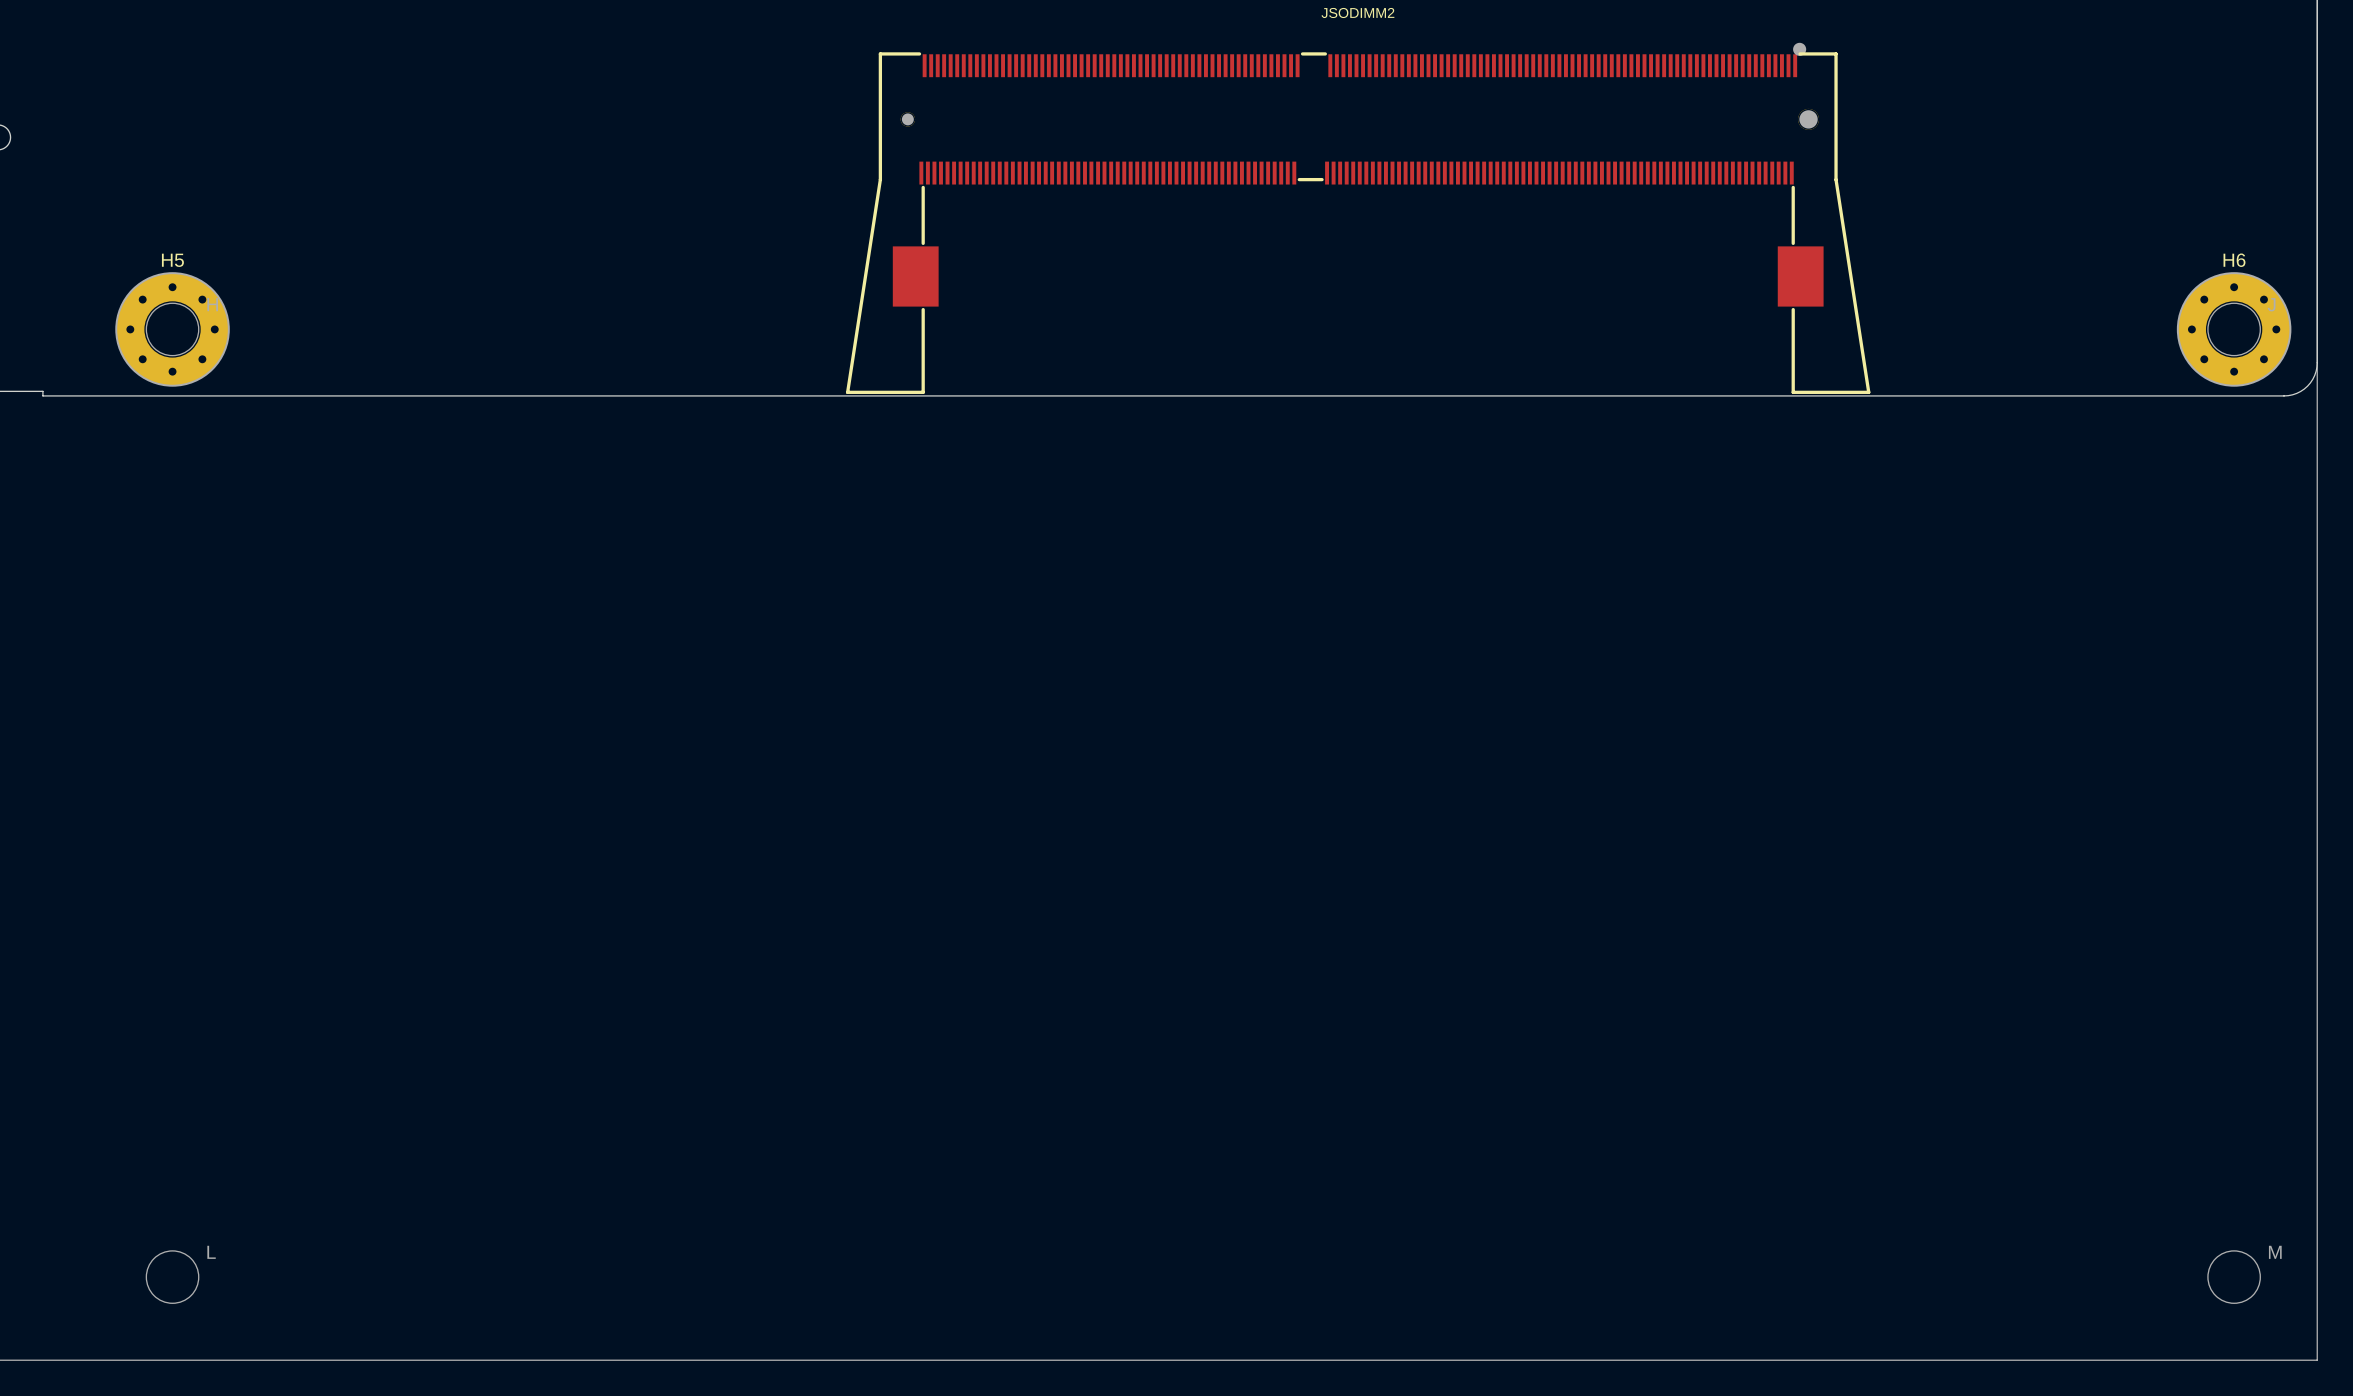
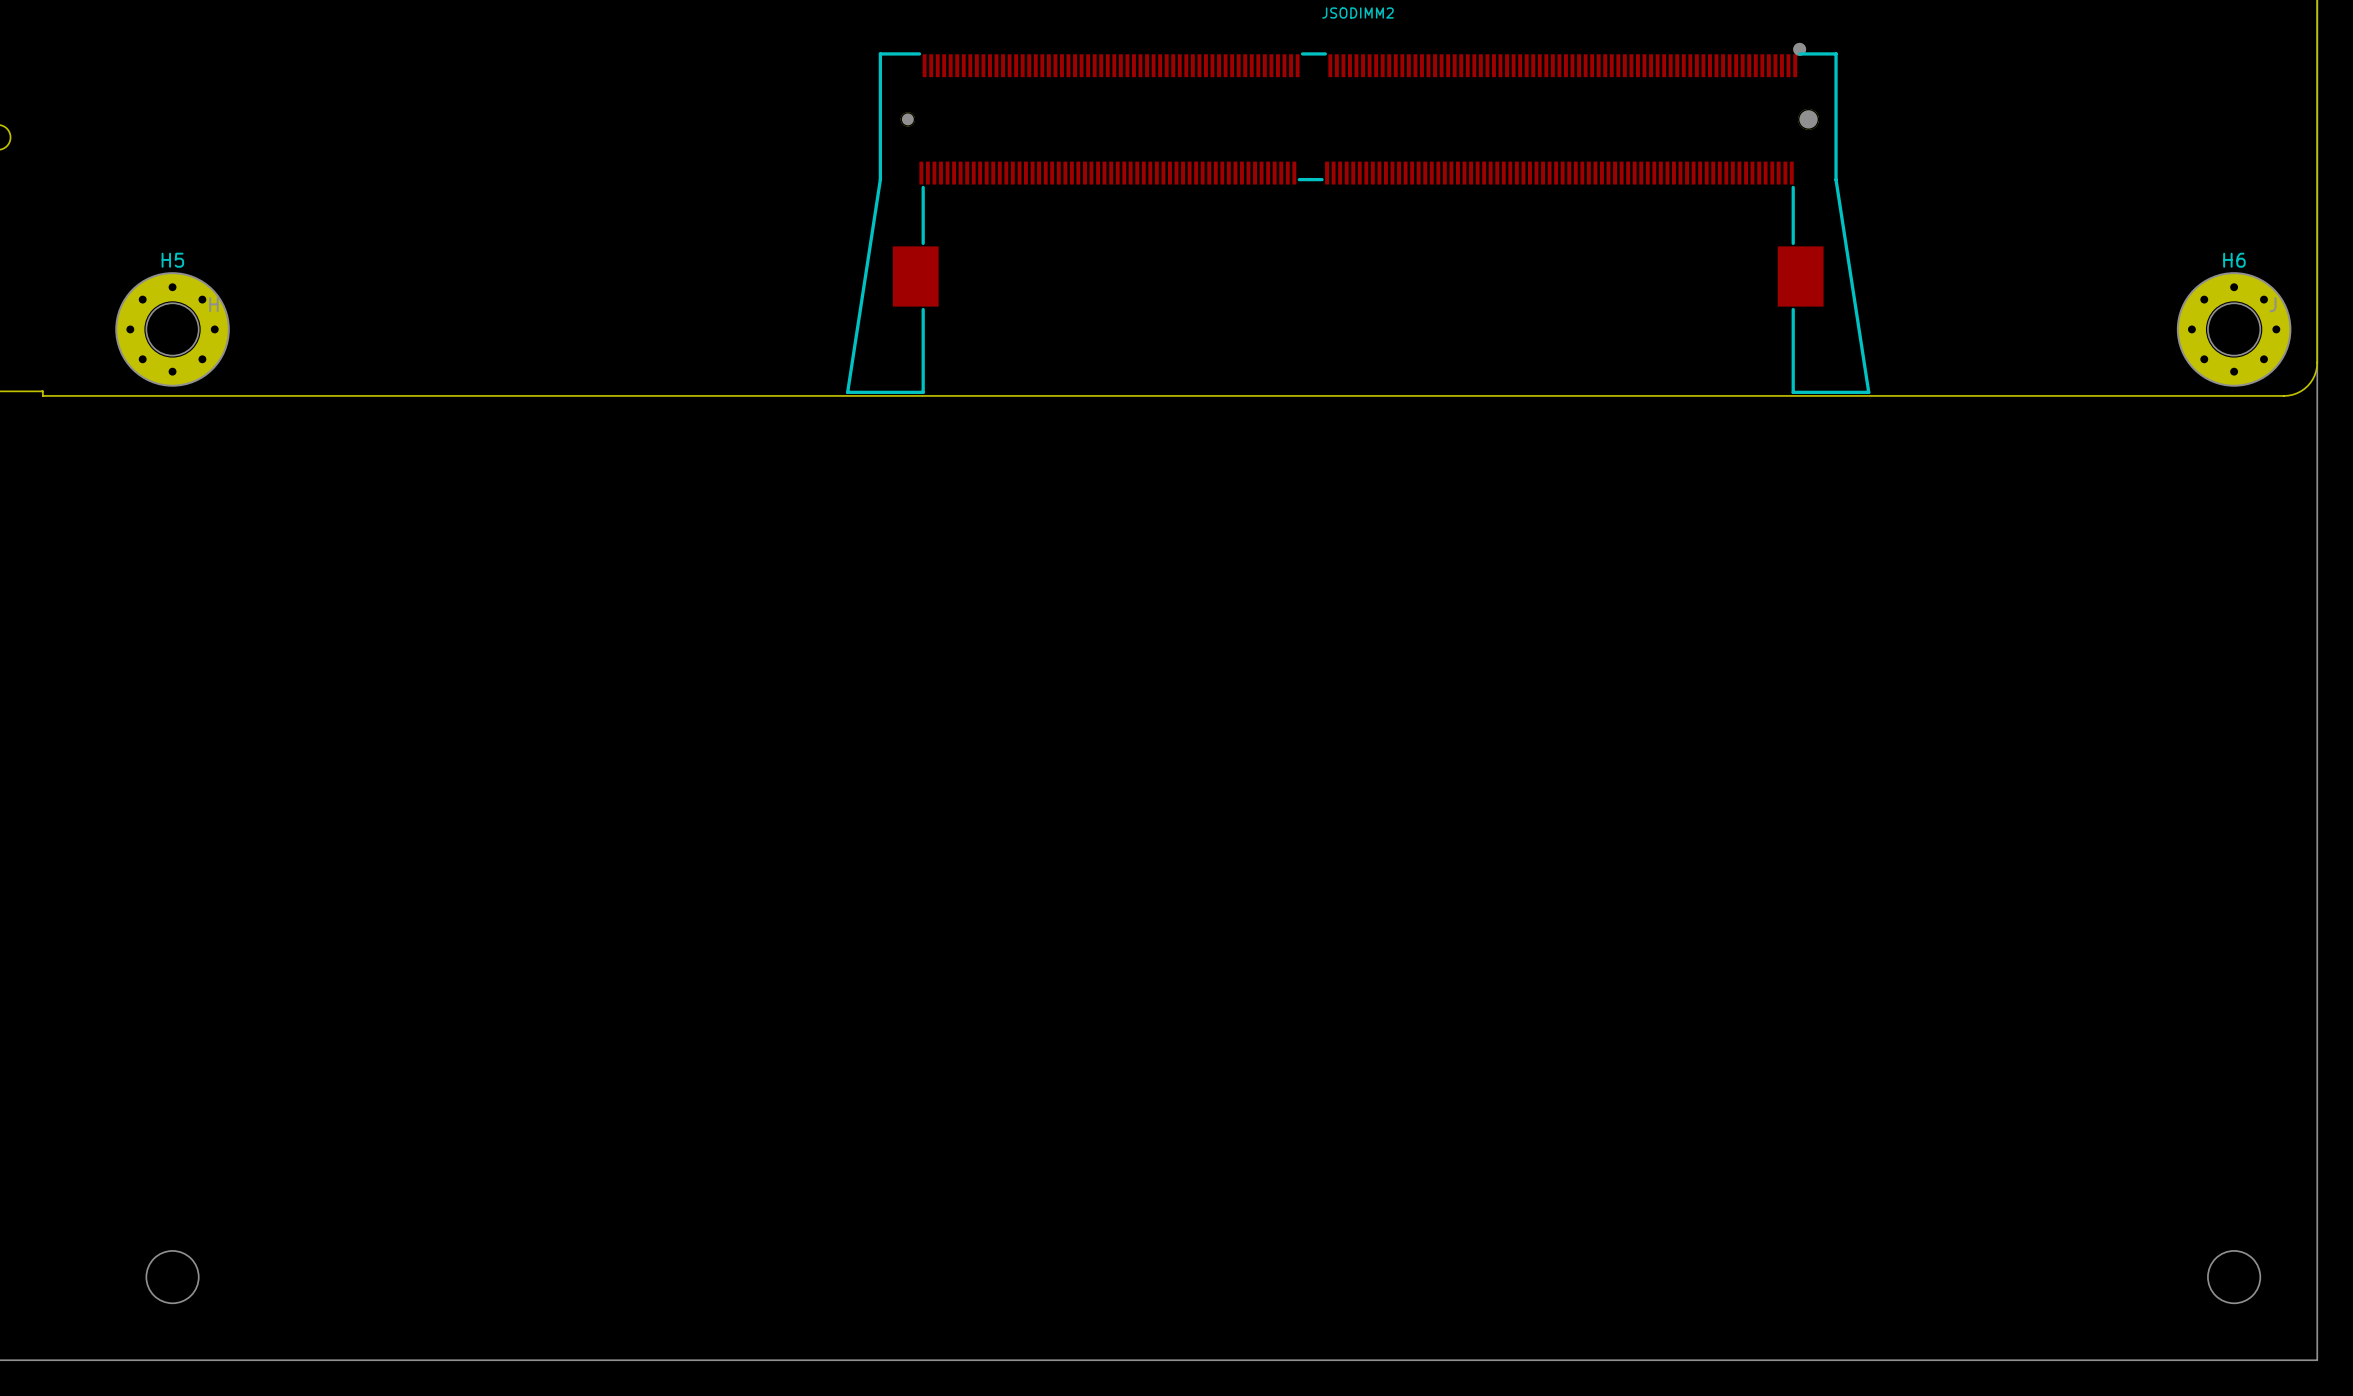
text: L (211, 1252) -> none
text: M (2275, 1252) -> none

